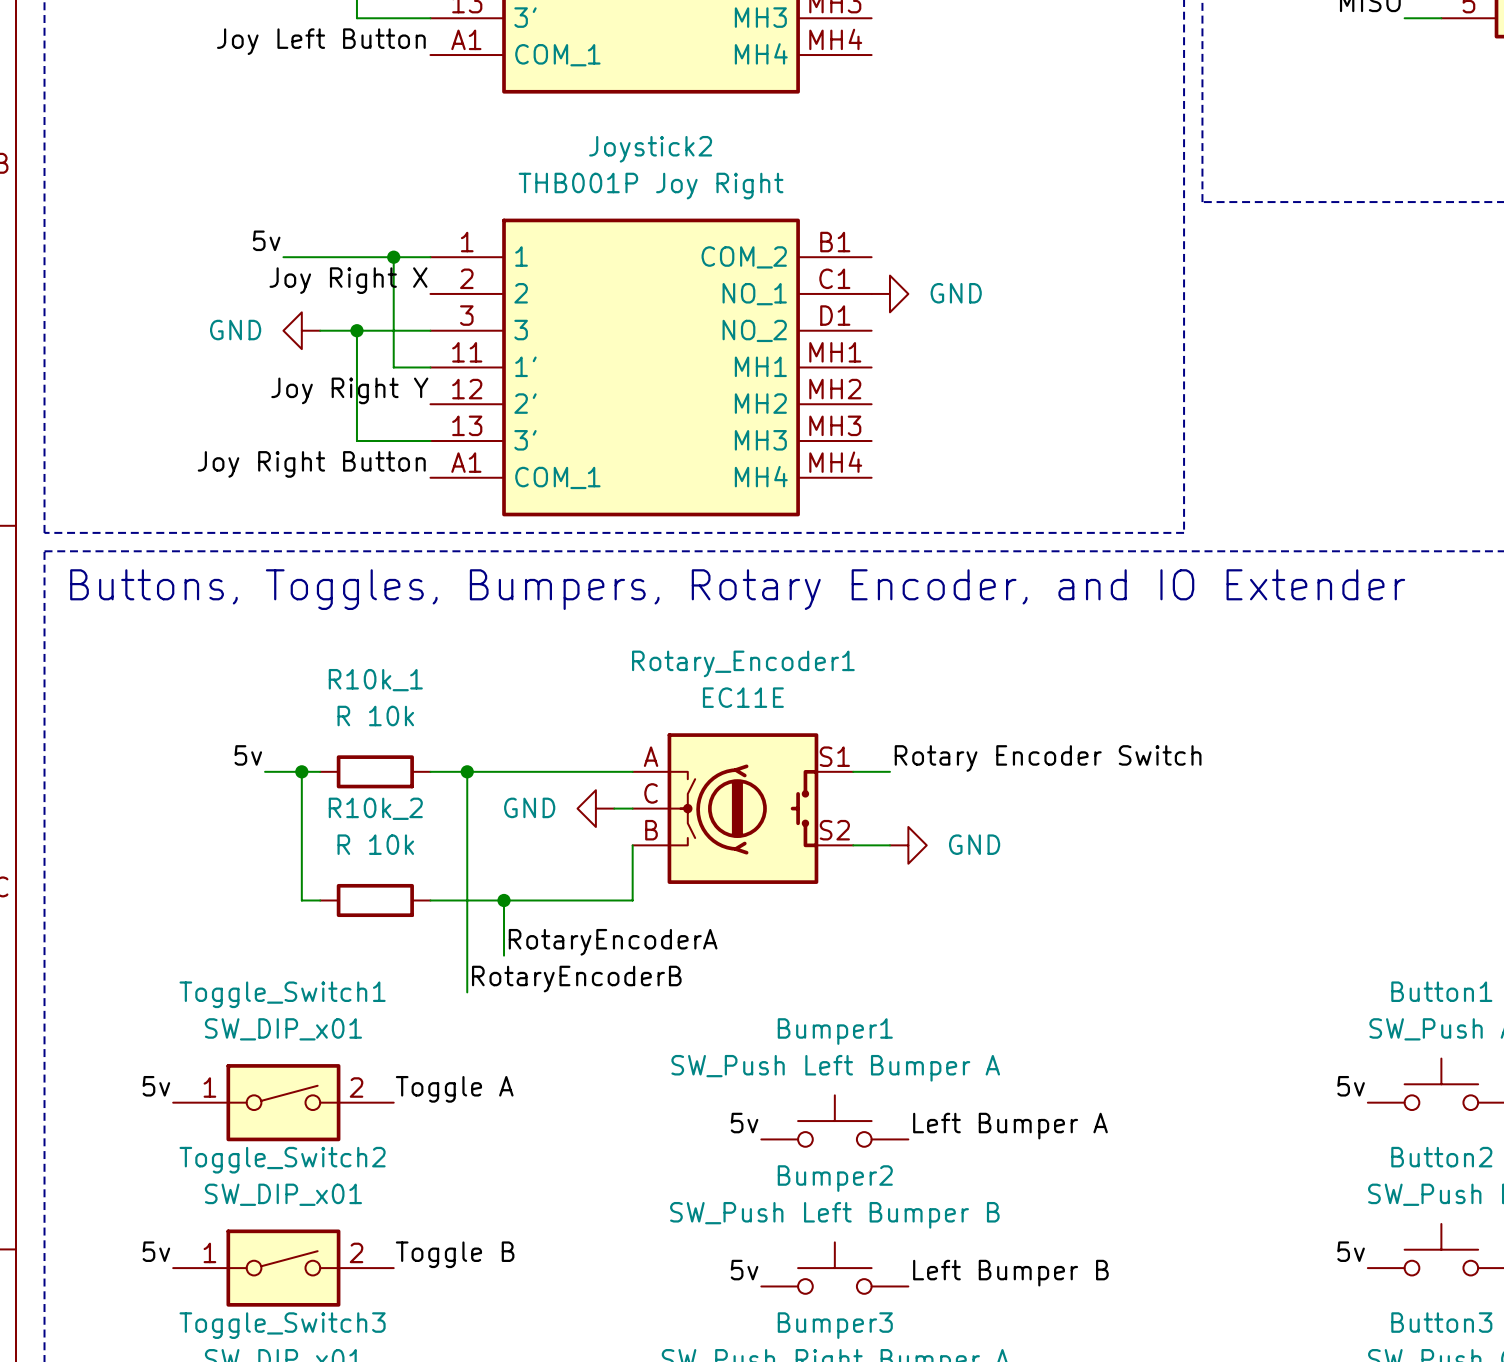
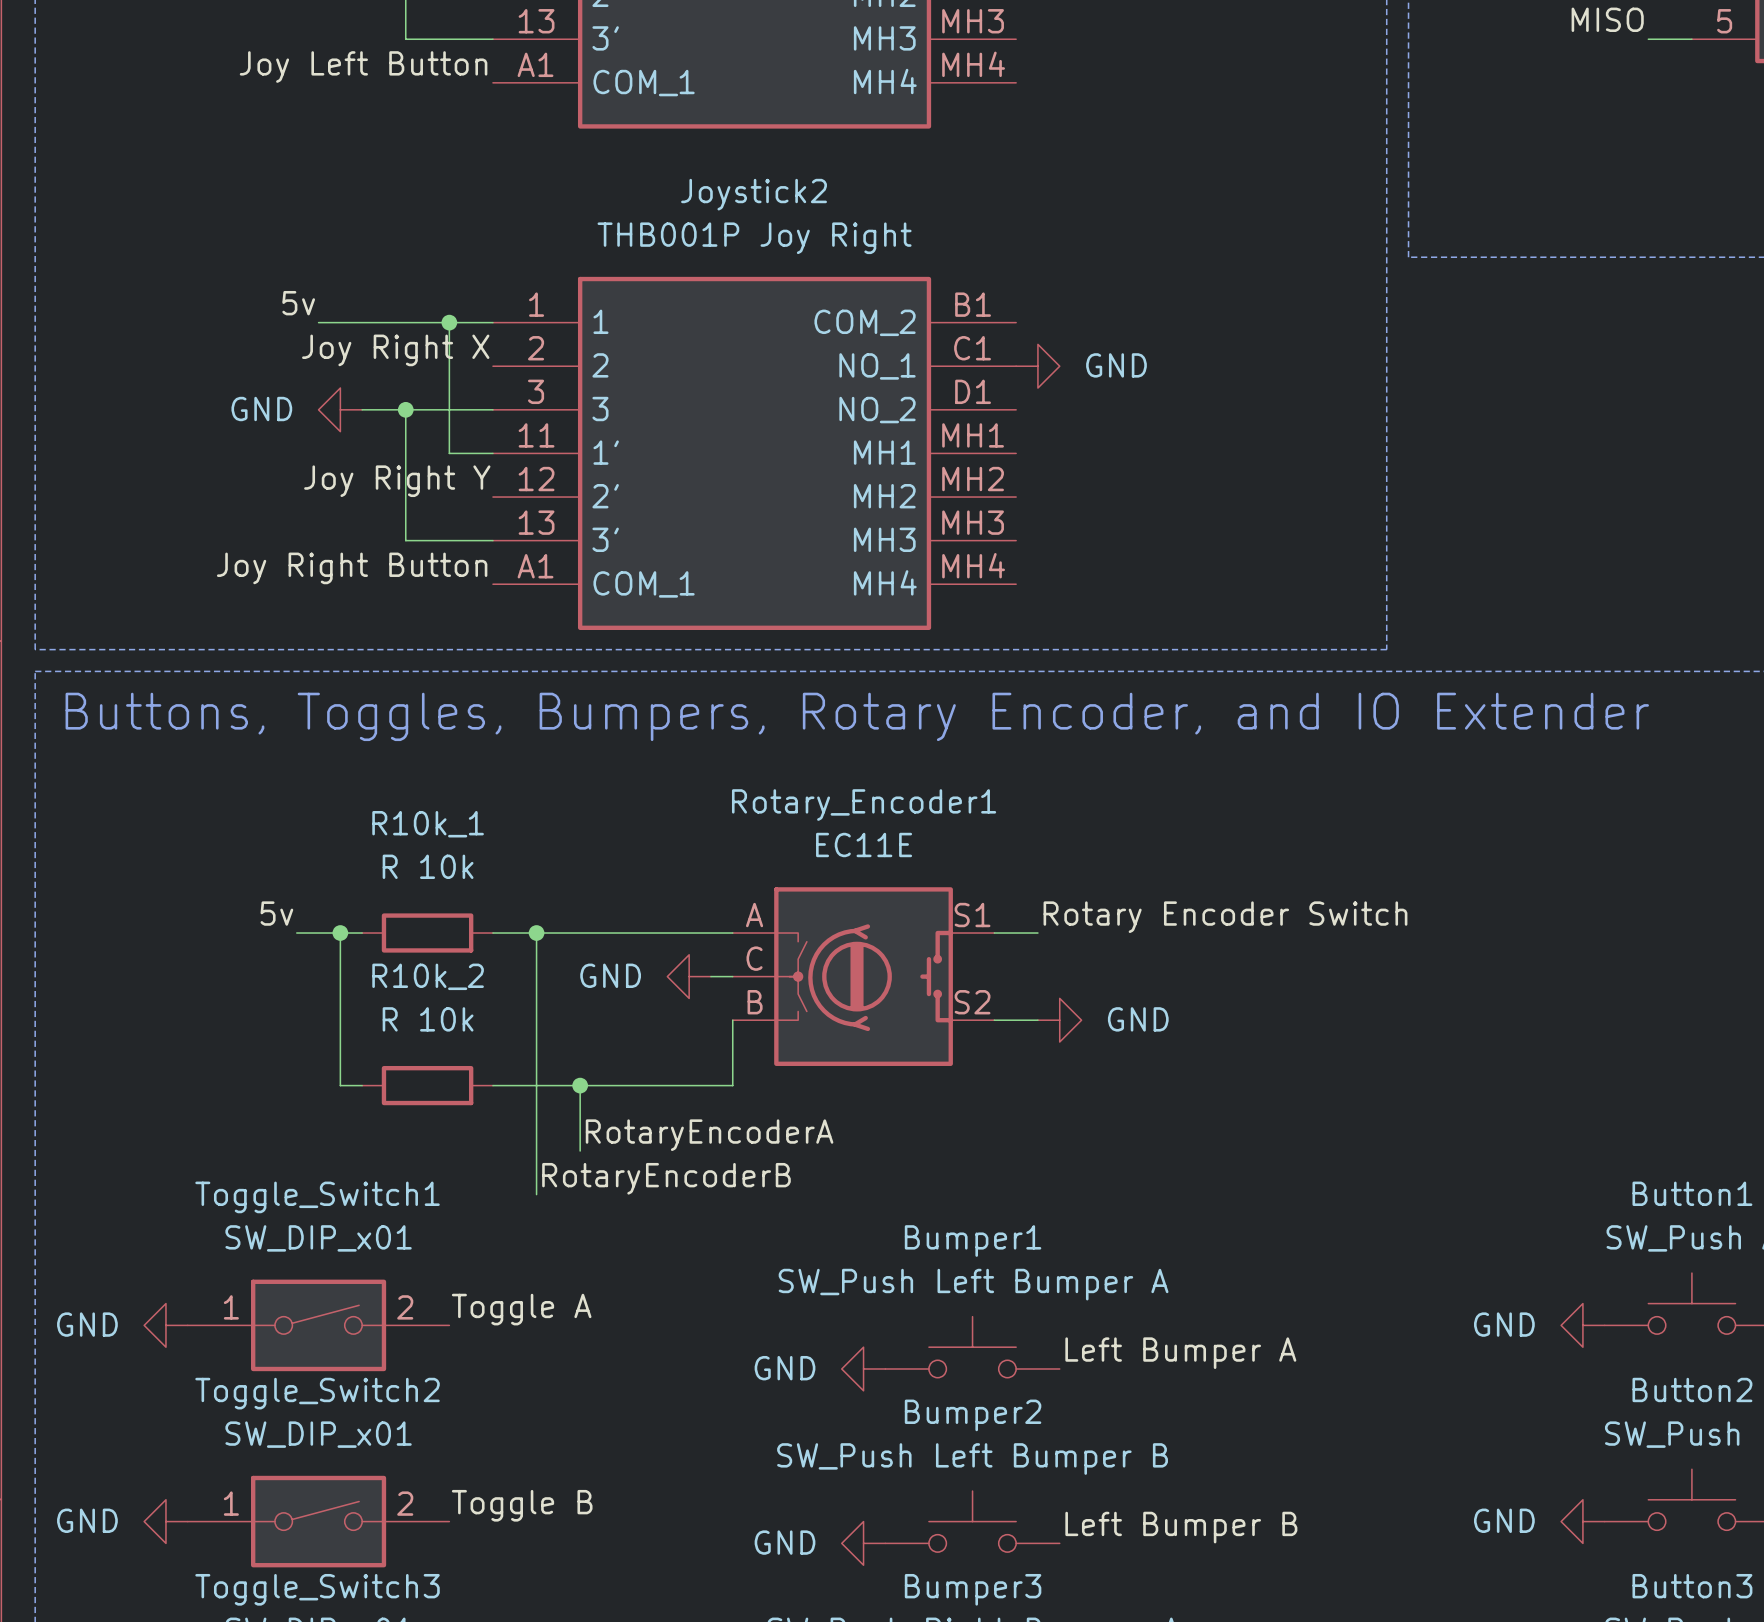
label: 5v (156, 1086) -> none
label: 5v (1351, 1086) -> none
power symbol: none -> GND (165, 1325)
power symbol: none -> GND (1582, 1325)
label: 5v (744, 1123) -> none
power symbol: none -> GND (863, 1368)
label: 5v (156, 1251) -> none
label: 5v (1351, 1251) -> none
power symbol: none -> GND (165, 1521)
power symbol: none -> GND (1582, 1521)
label: 5v (744, 1270) -> none
power symbol: none -> GND (863, 1543)

